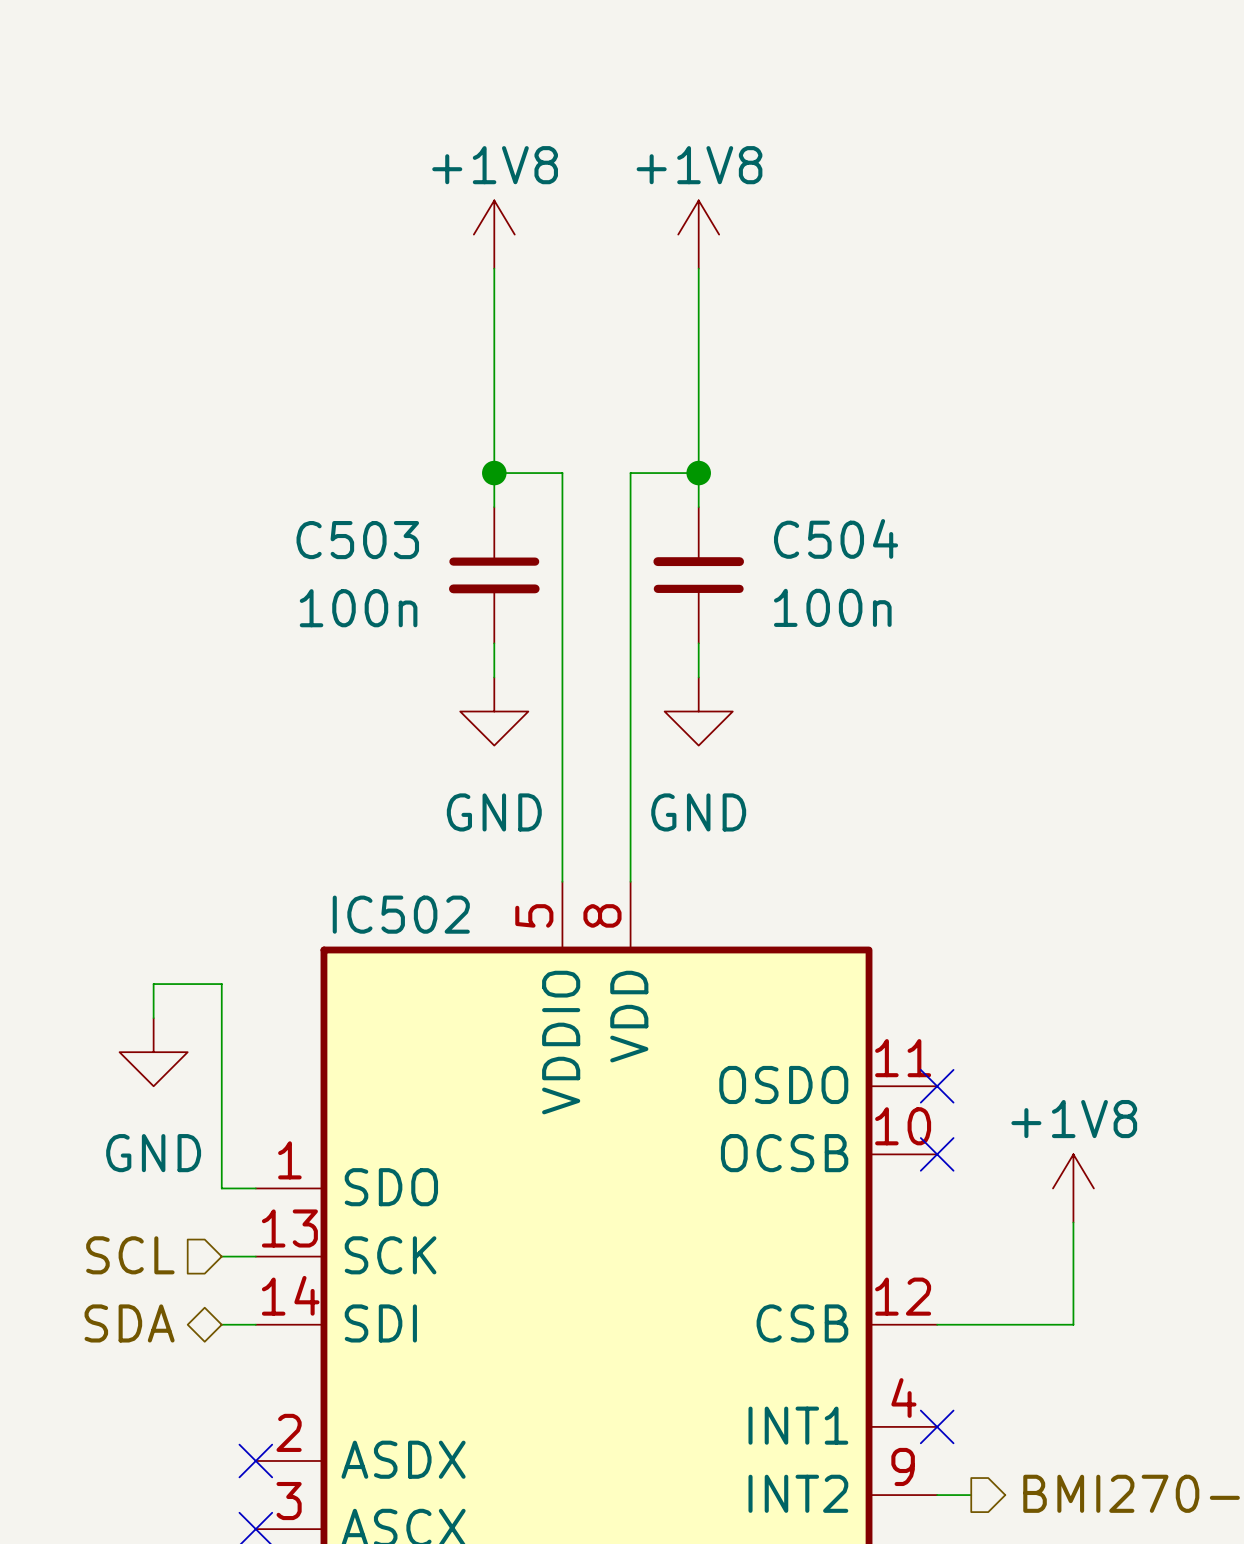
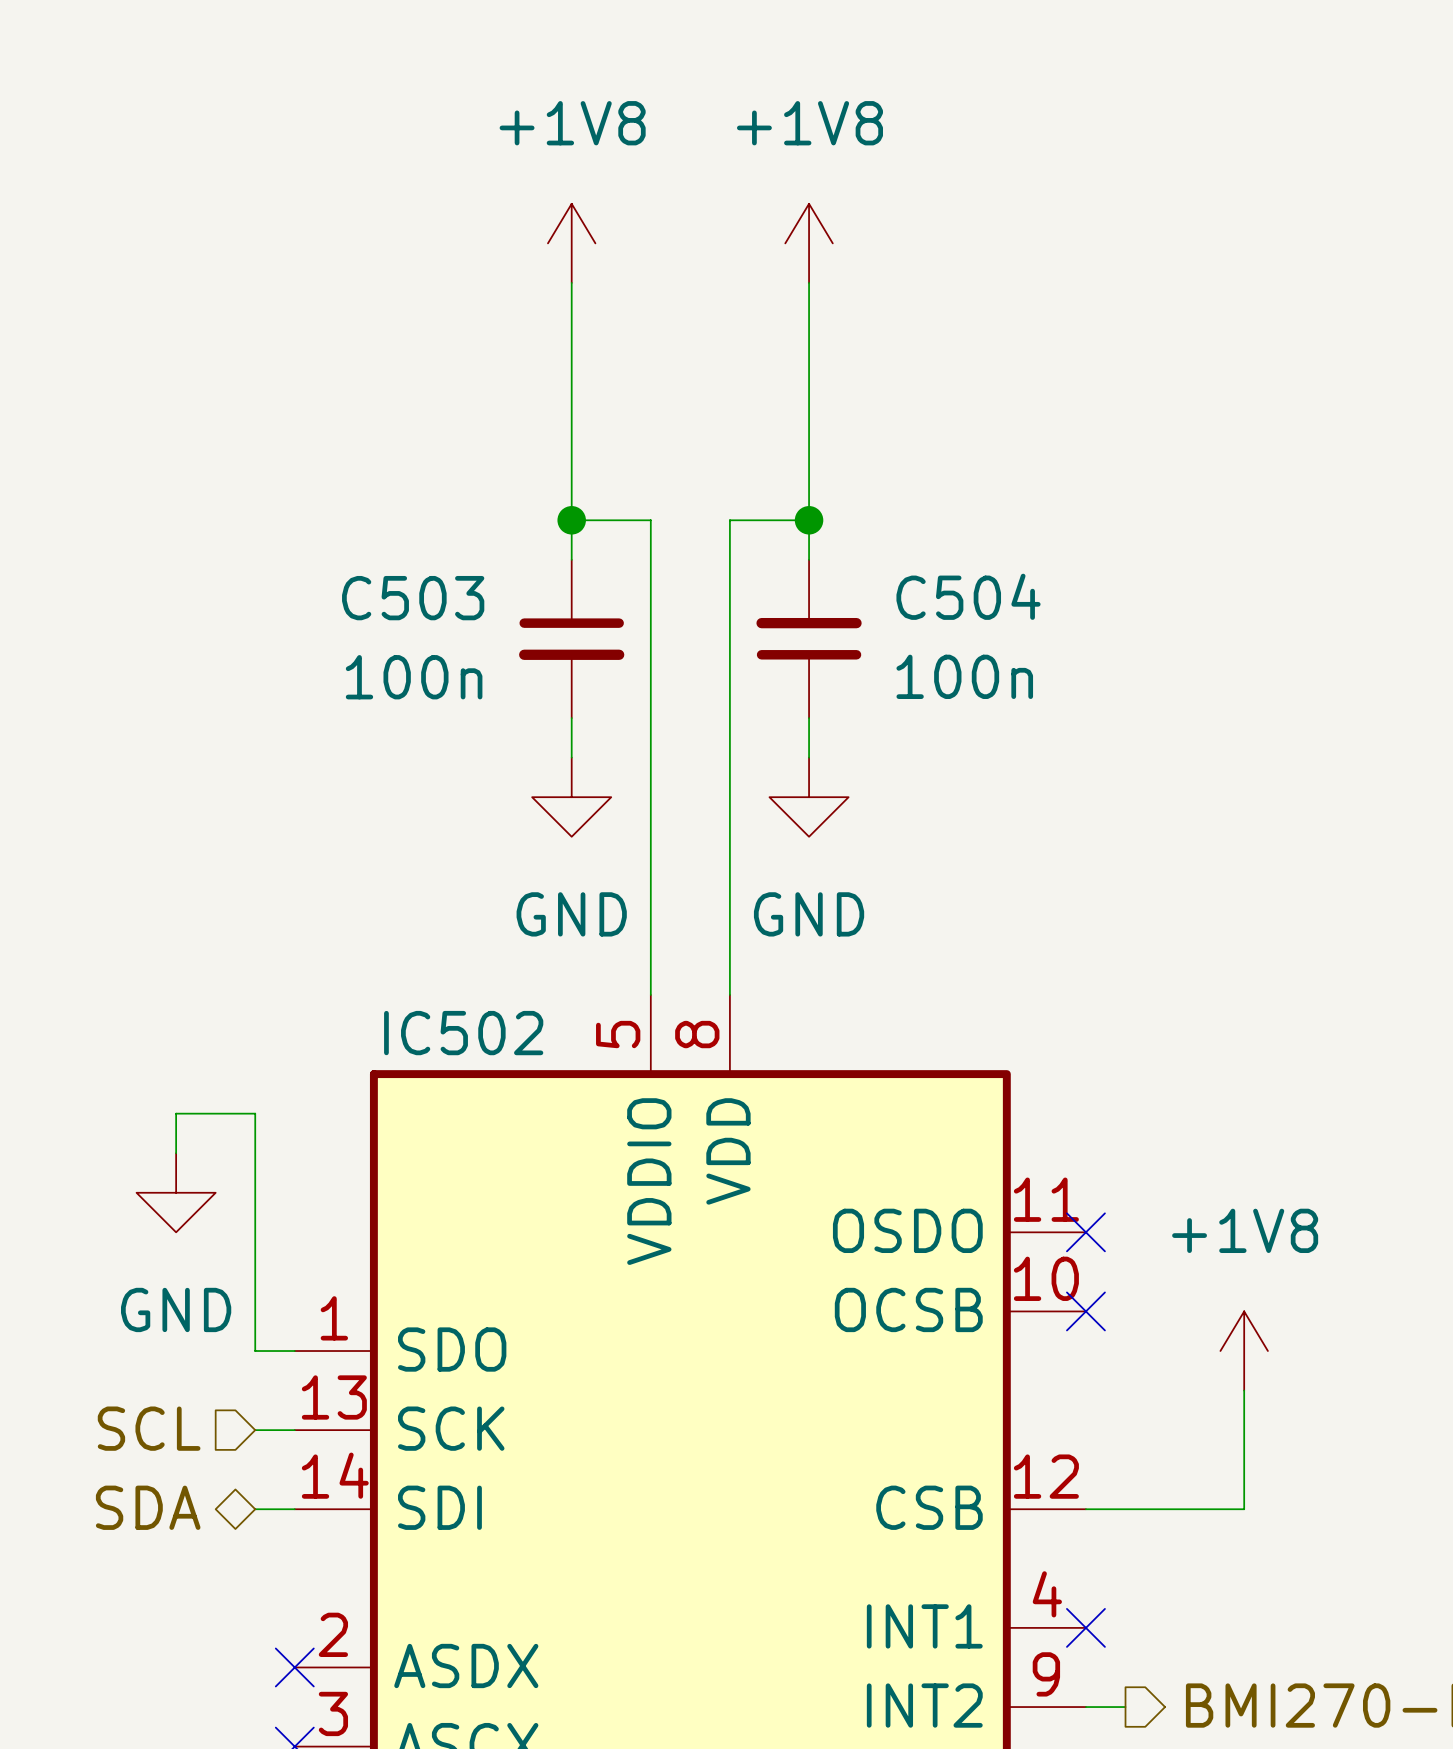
power symbol text position: +1V8 (495, 165) -> +1V8 (572, 123)
power symbol text position: +1V8 (699, 165) -> +1V8 (809, 123)
power symbol text position: +1V8 (1074, 1119) -> +1V8 (1245, 1230)

